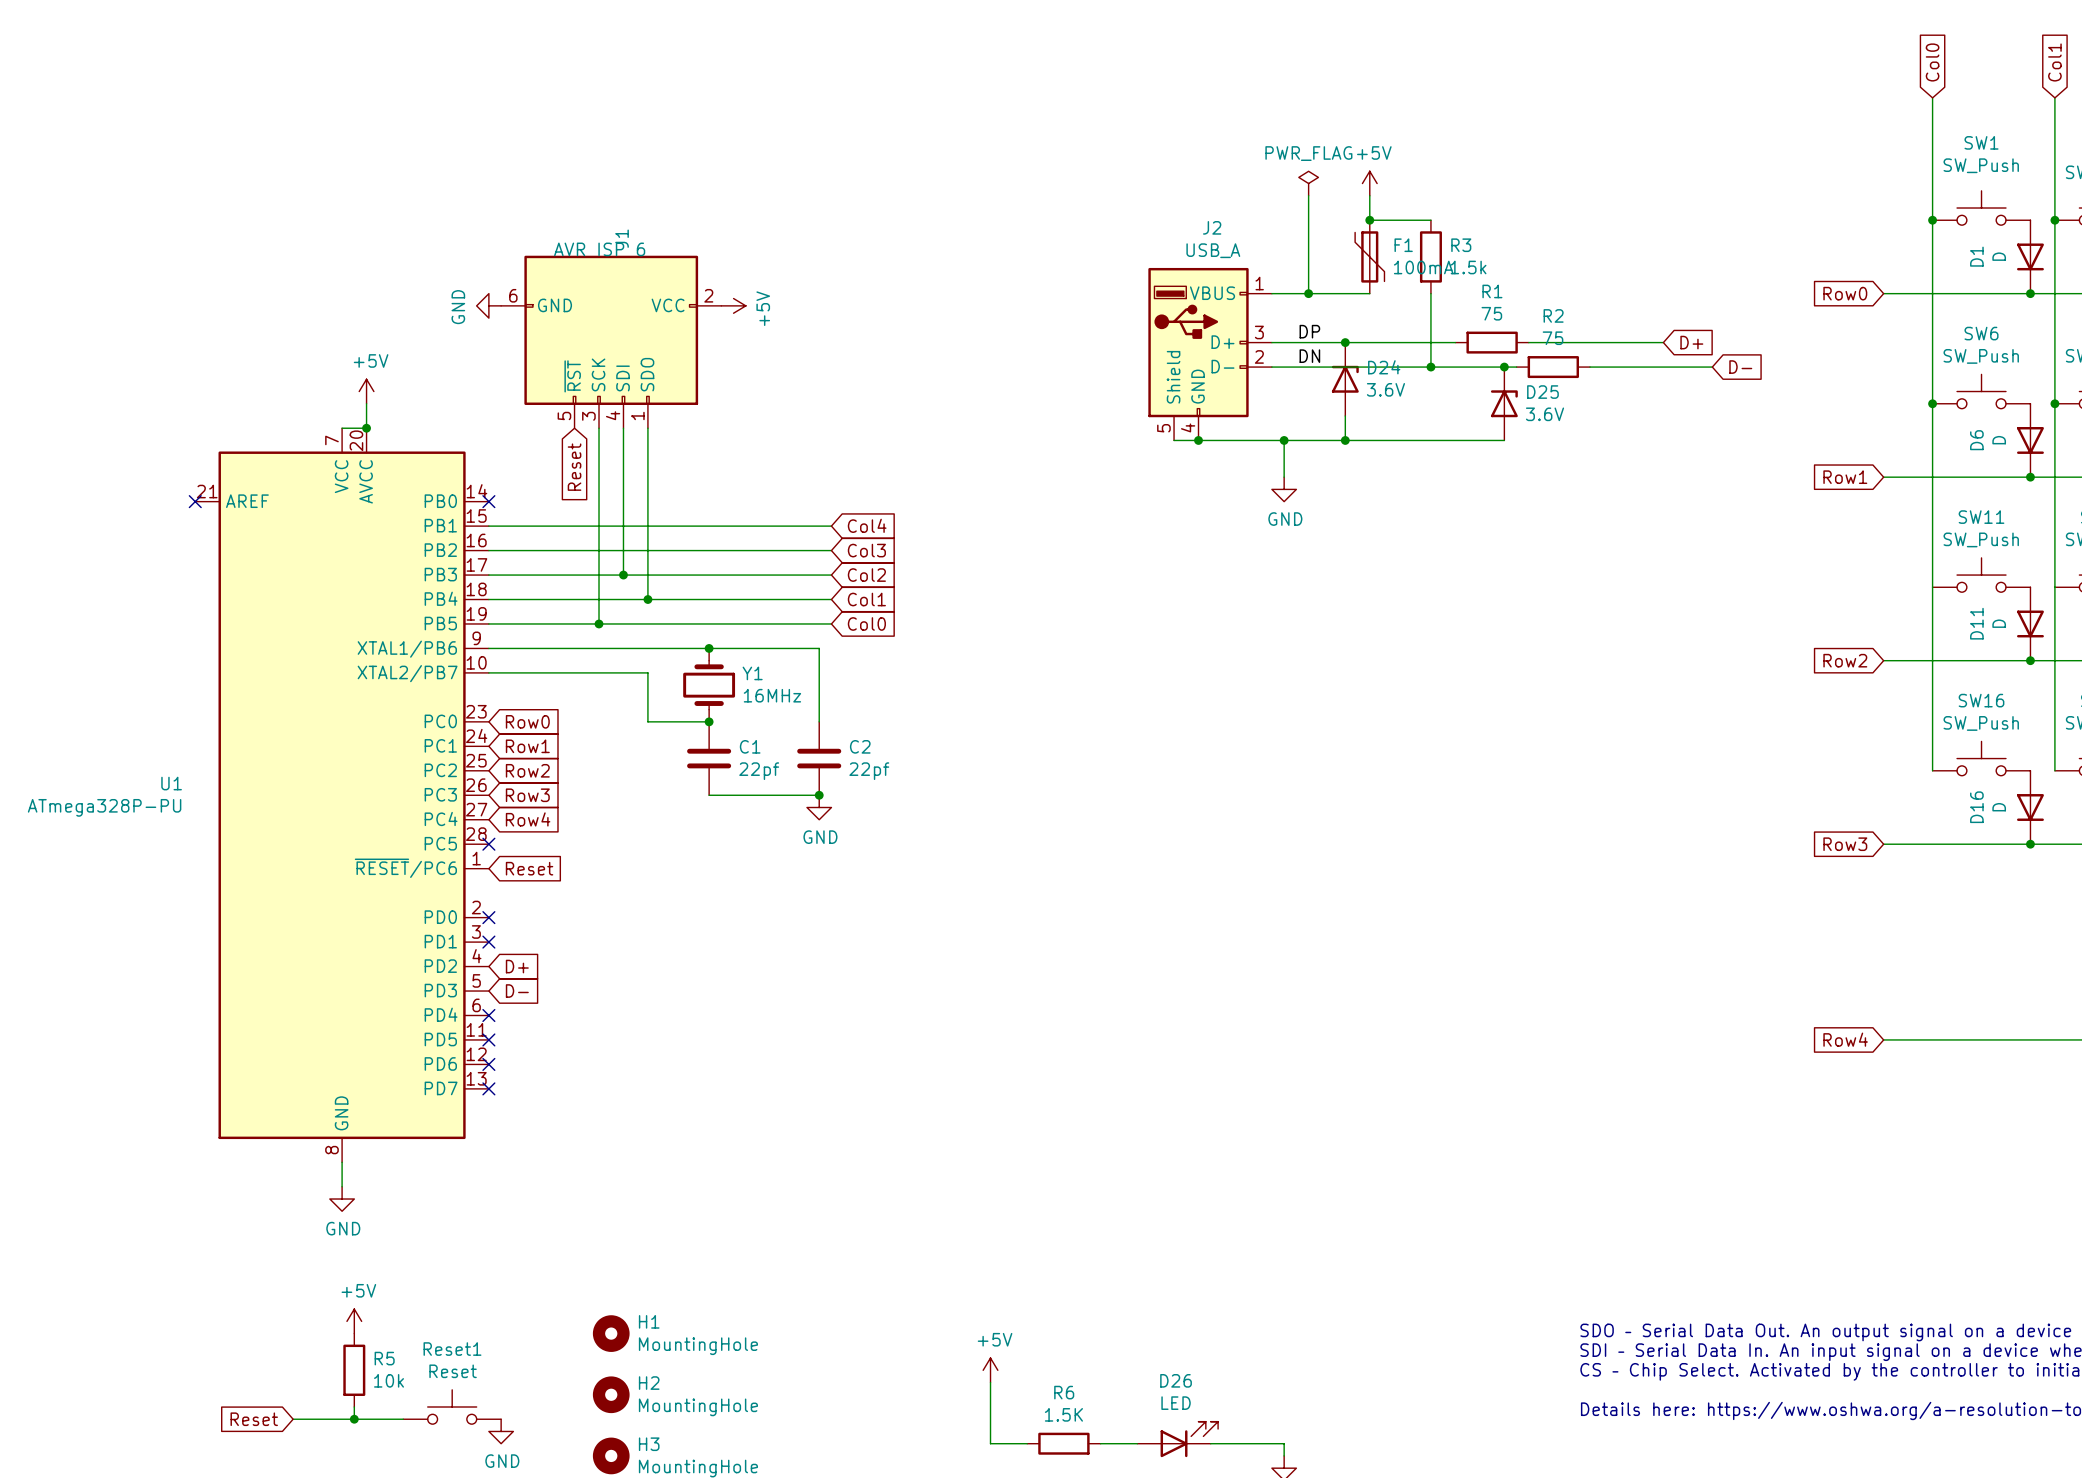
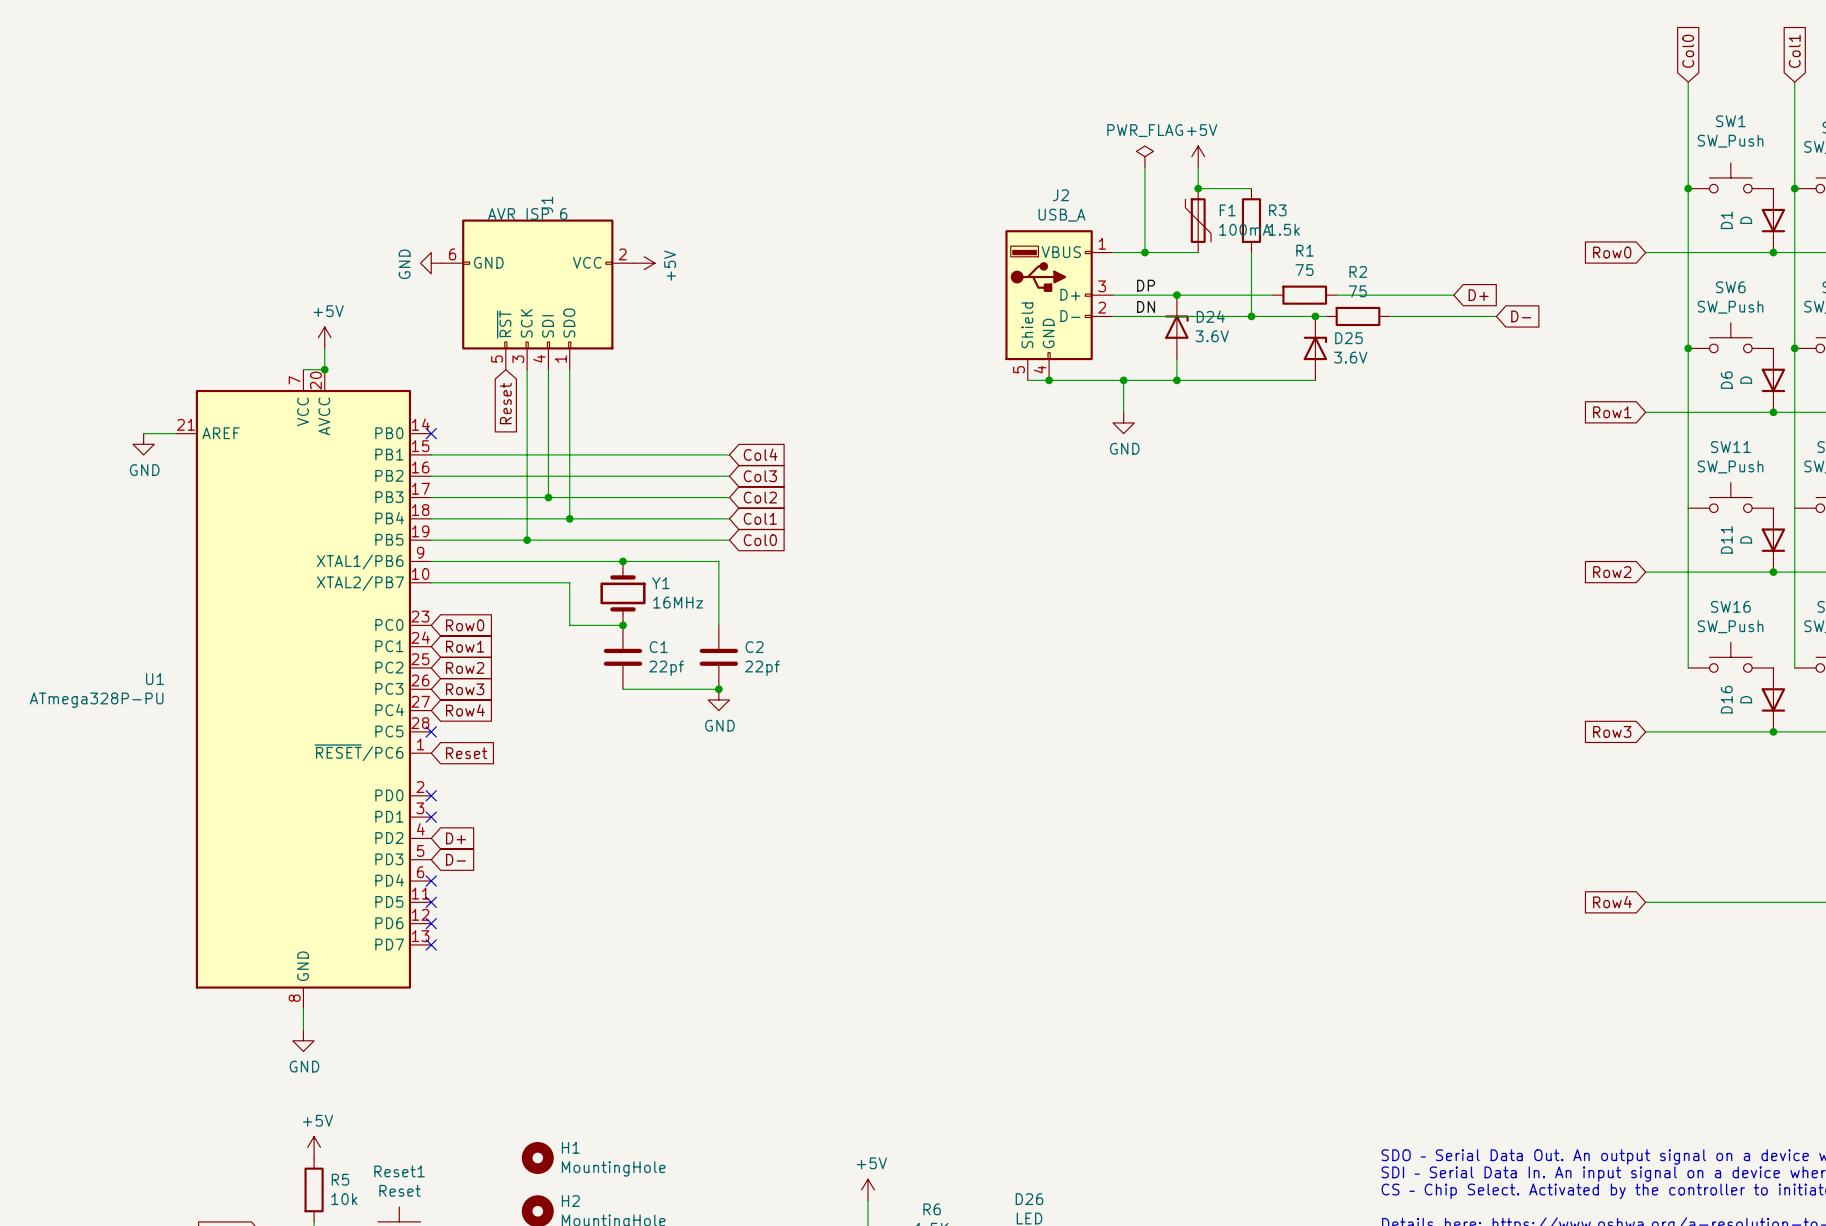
wire: none -> (143, 433) (175, 433)
no-connect mark: (195, 501) -> none
power symbol: none -> GND (143, 444)

